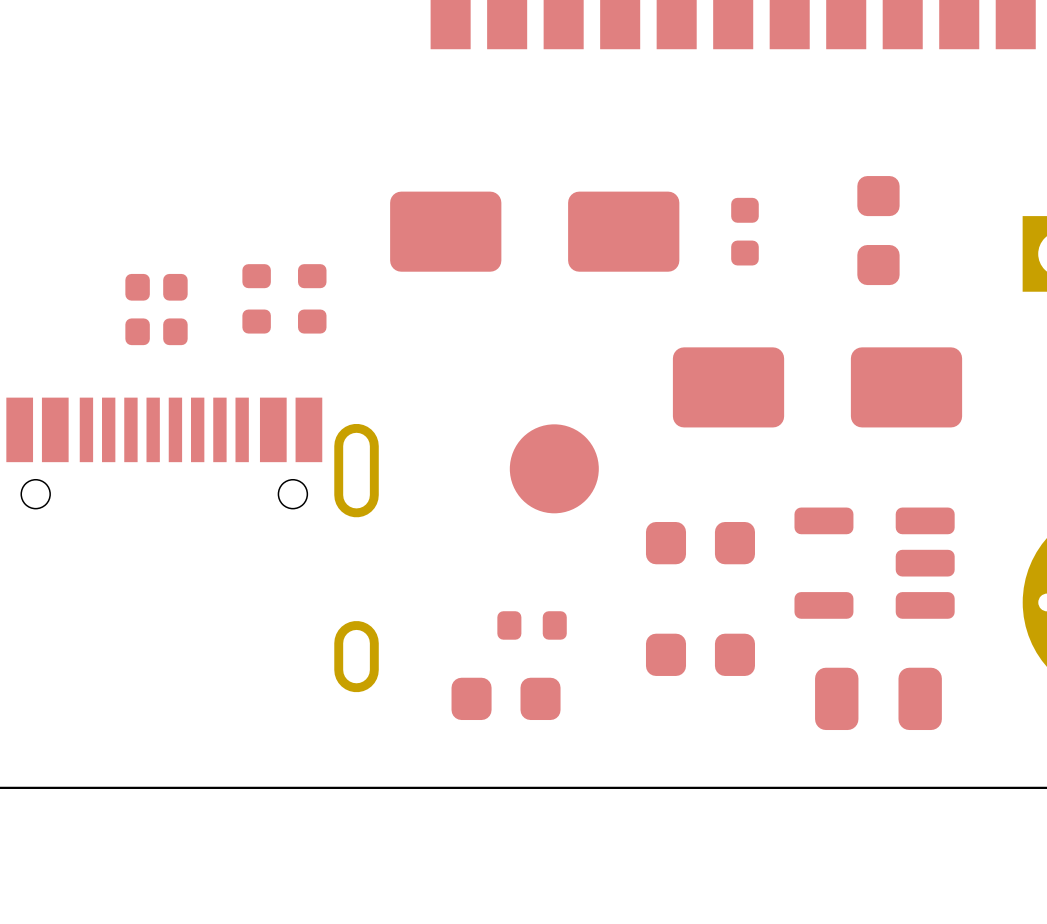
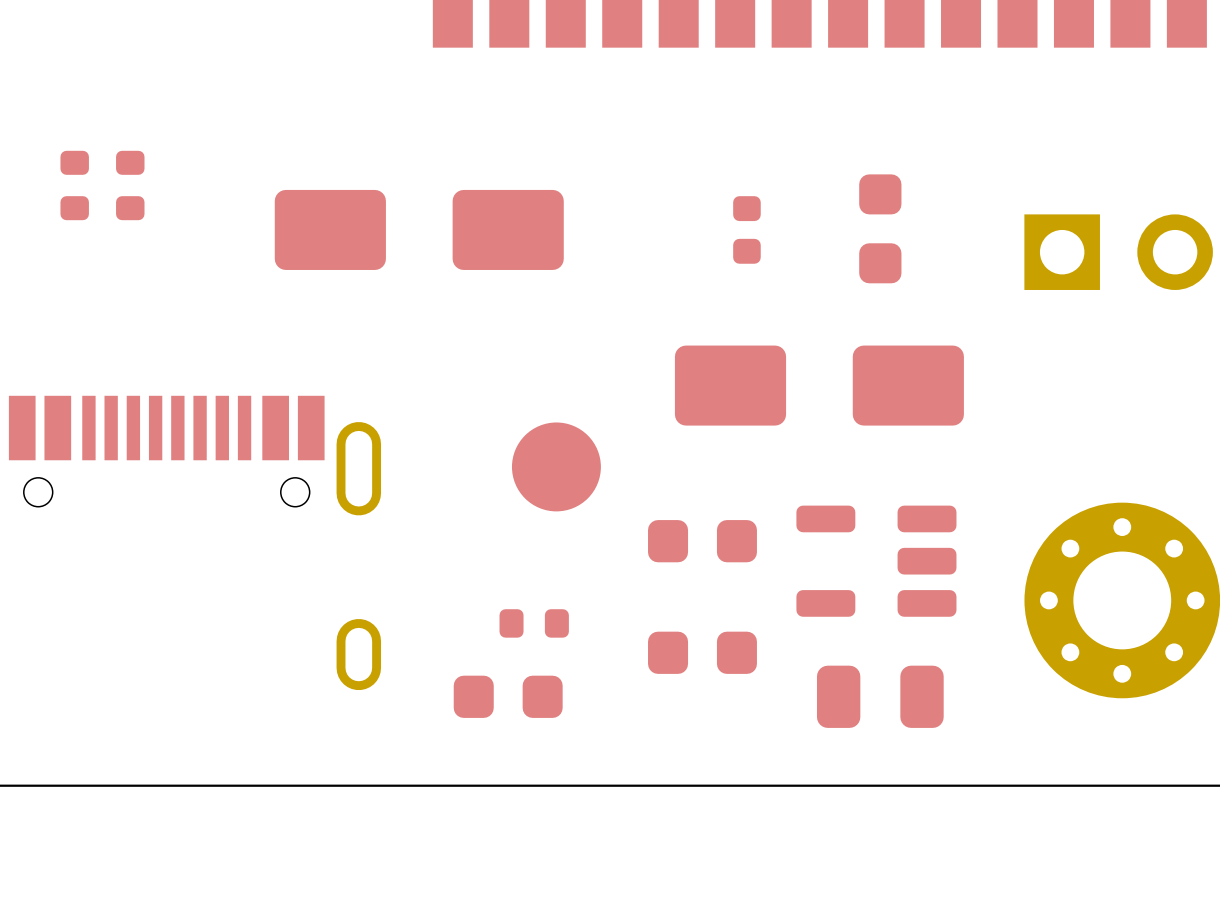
part: none -> (74, 185)
part: none -> (130, 185)
part position: (534, 231) -> (419, 229)
part: (156, 287) -> none
part: (256, 298) -> none
part: (312, 298) -> none
part: (156, 331) -> none

